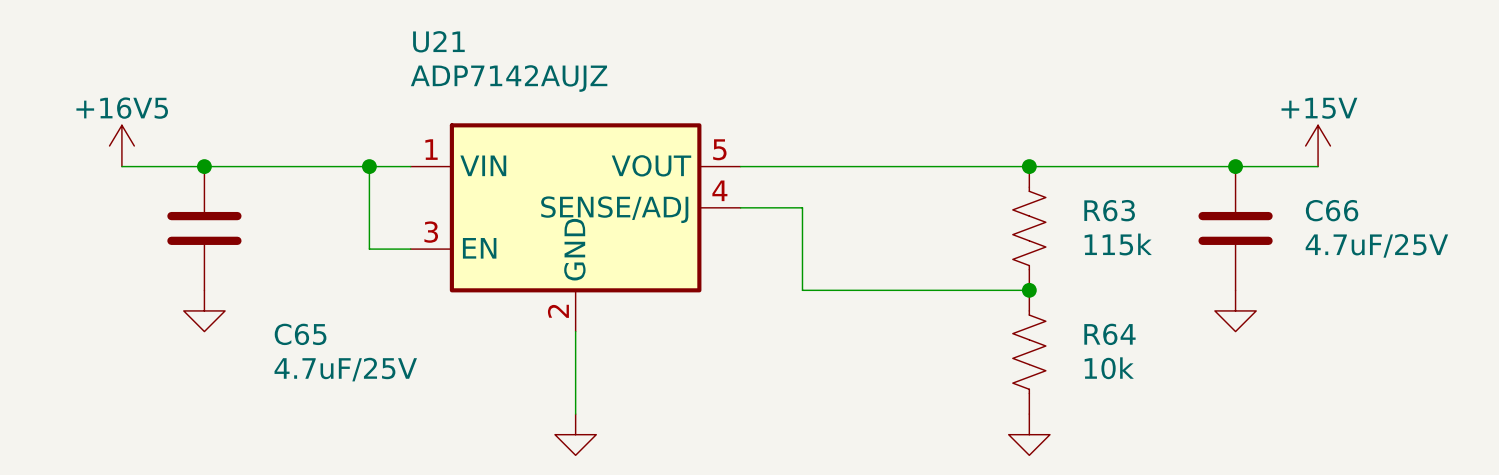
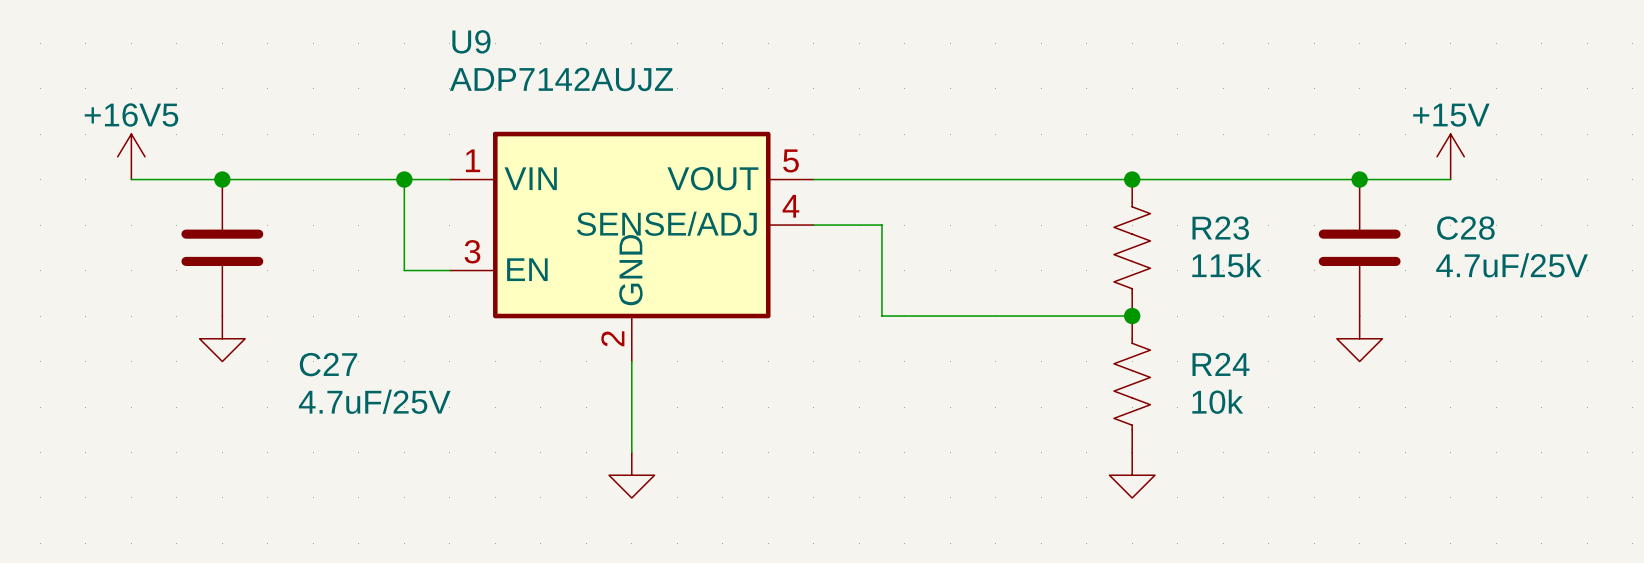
U21 name: U21 (438, 41) -> U9 (471, 41)
R63 name: R63 (1109, 210) -> R23 (1220, 228)
C66 name: C66 (1332, 210) -> C28 (1465, 228)
C65 name: C65 (300, 334) -> C27 (328, 364)
R64 name: R64 (1109, 334) -> R24 (1220, 364)

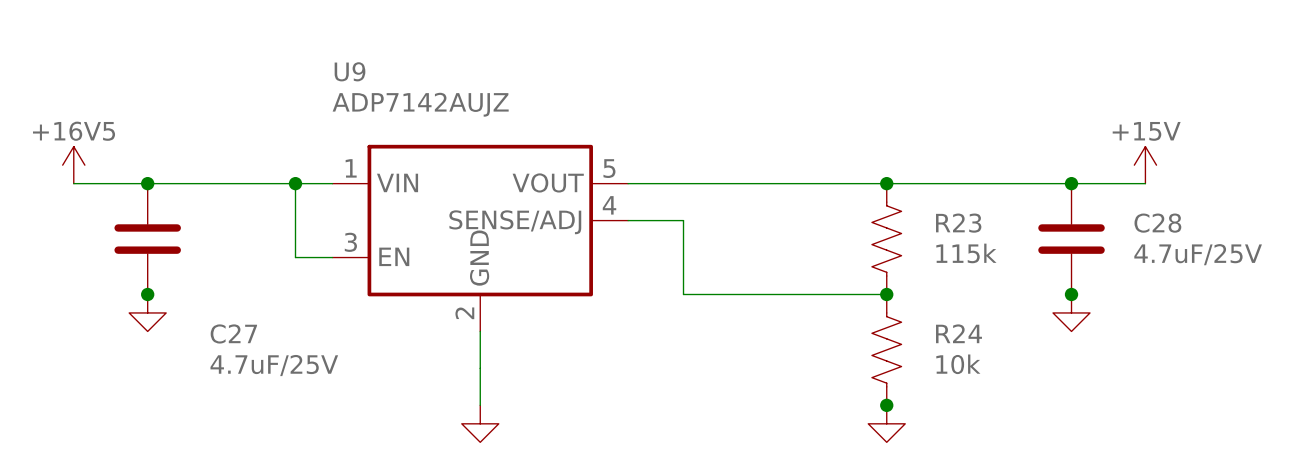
junction: none -> (147, 294)
junction: none -> (1071, 294)
junction: none -> (886, 405)

